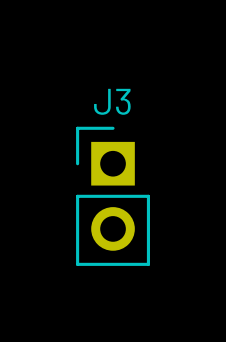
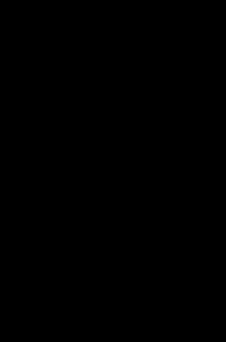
J3: (113, 196) -> none

